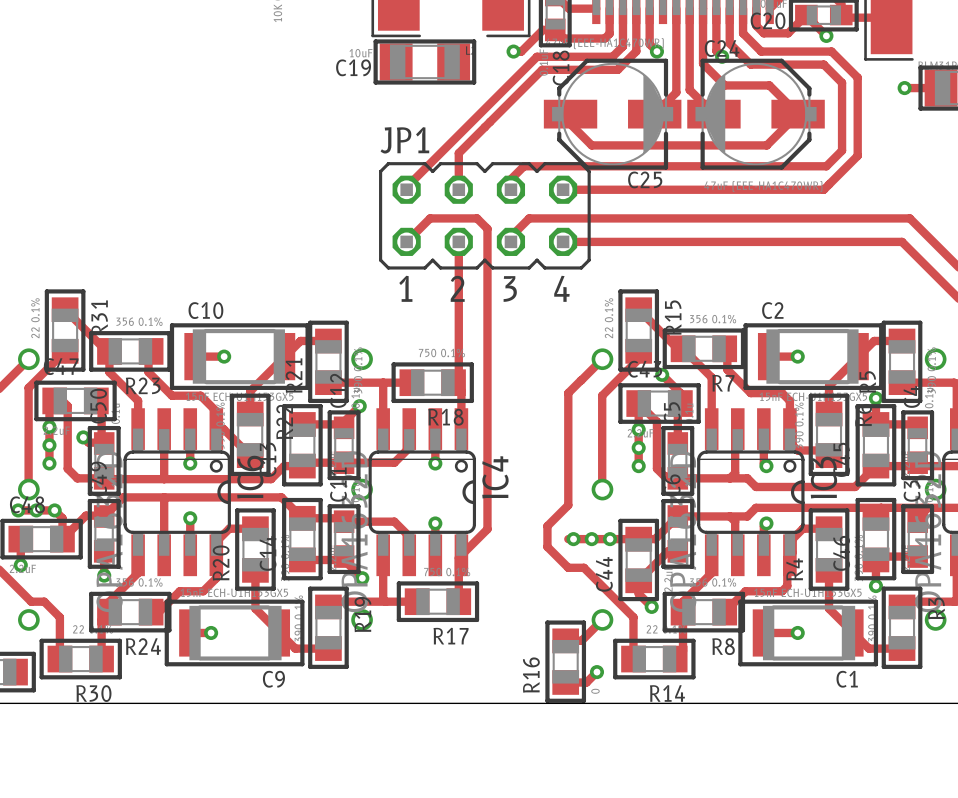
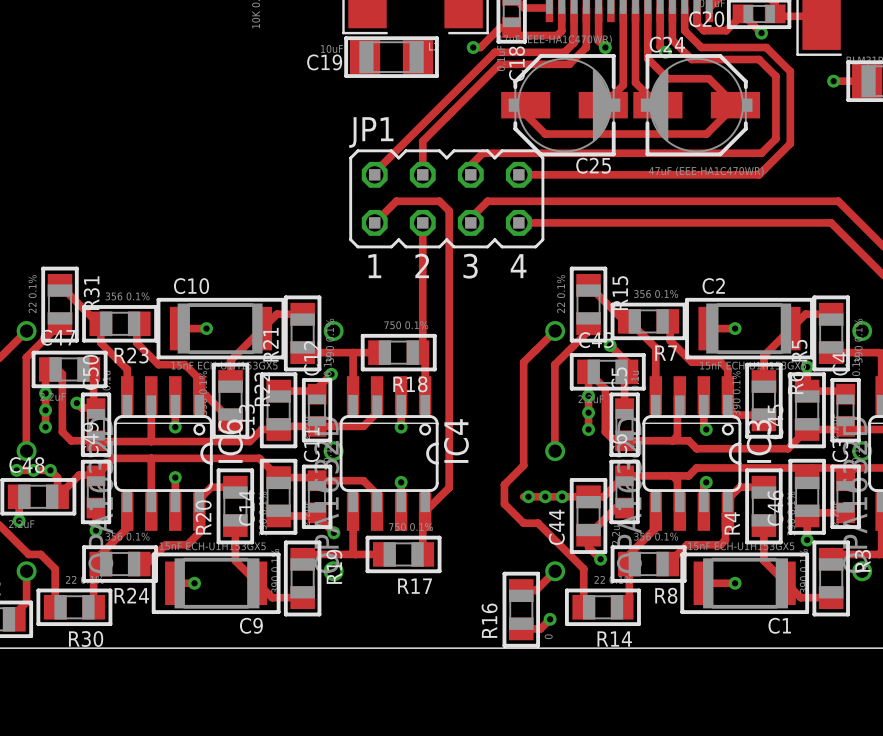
track: none -> (26, 571) (26, 602) (14, 614)

